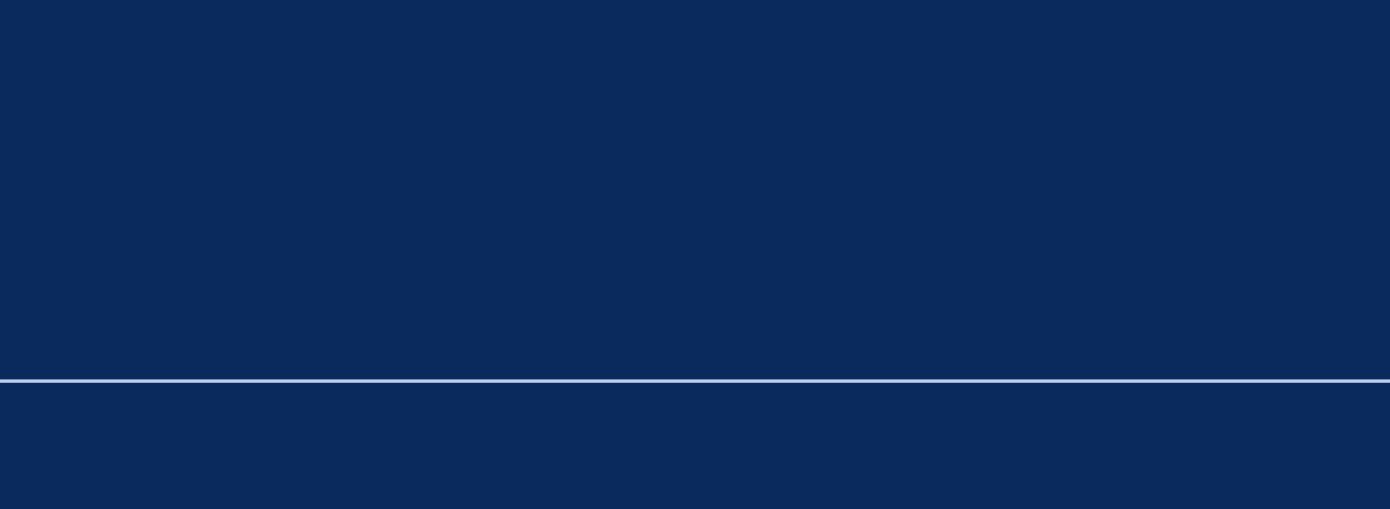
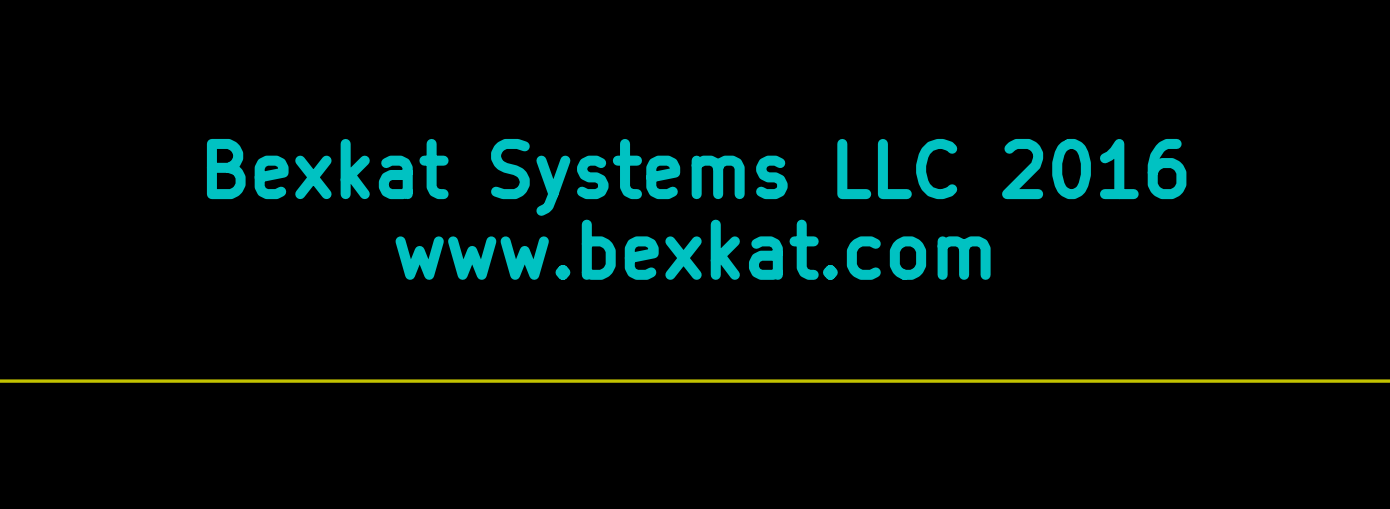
text: none -> Bexkat Systems LLC 2016 (696, 177)
text: none -> www.bexkat.com (693, 249)

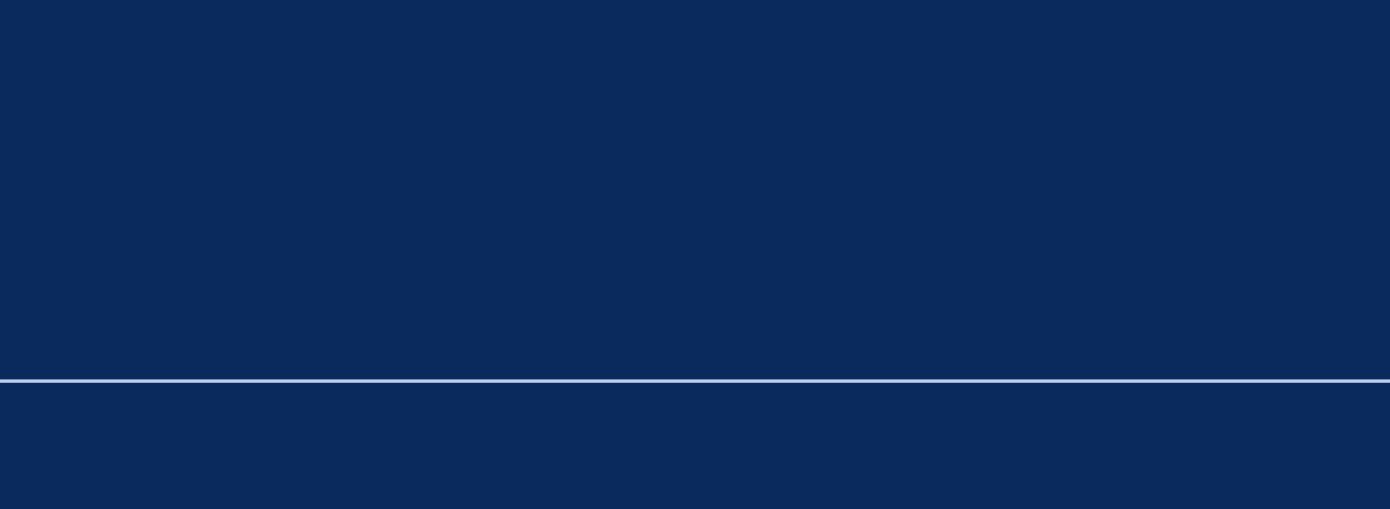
text: Bexkat Systems LLC 2016 (696, 177) -> none
text: www.bexkat.com (693, 249) -> none

